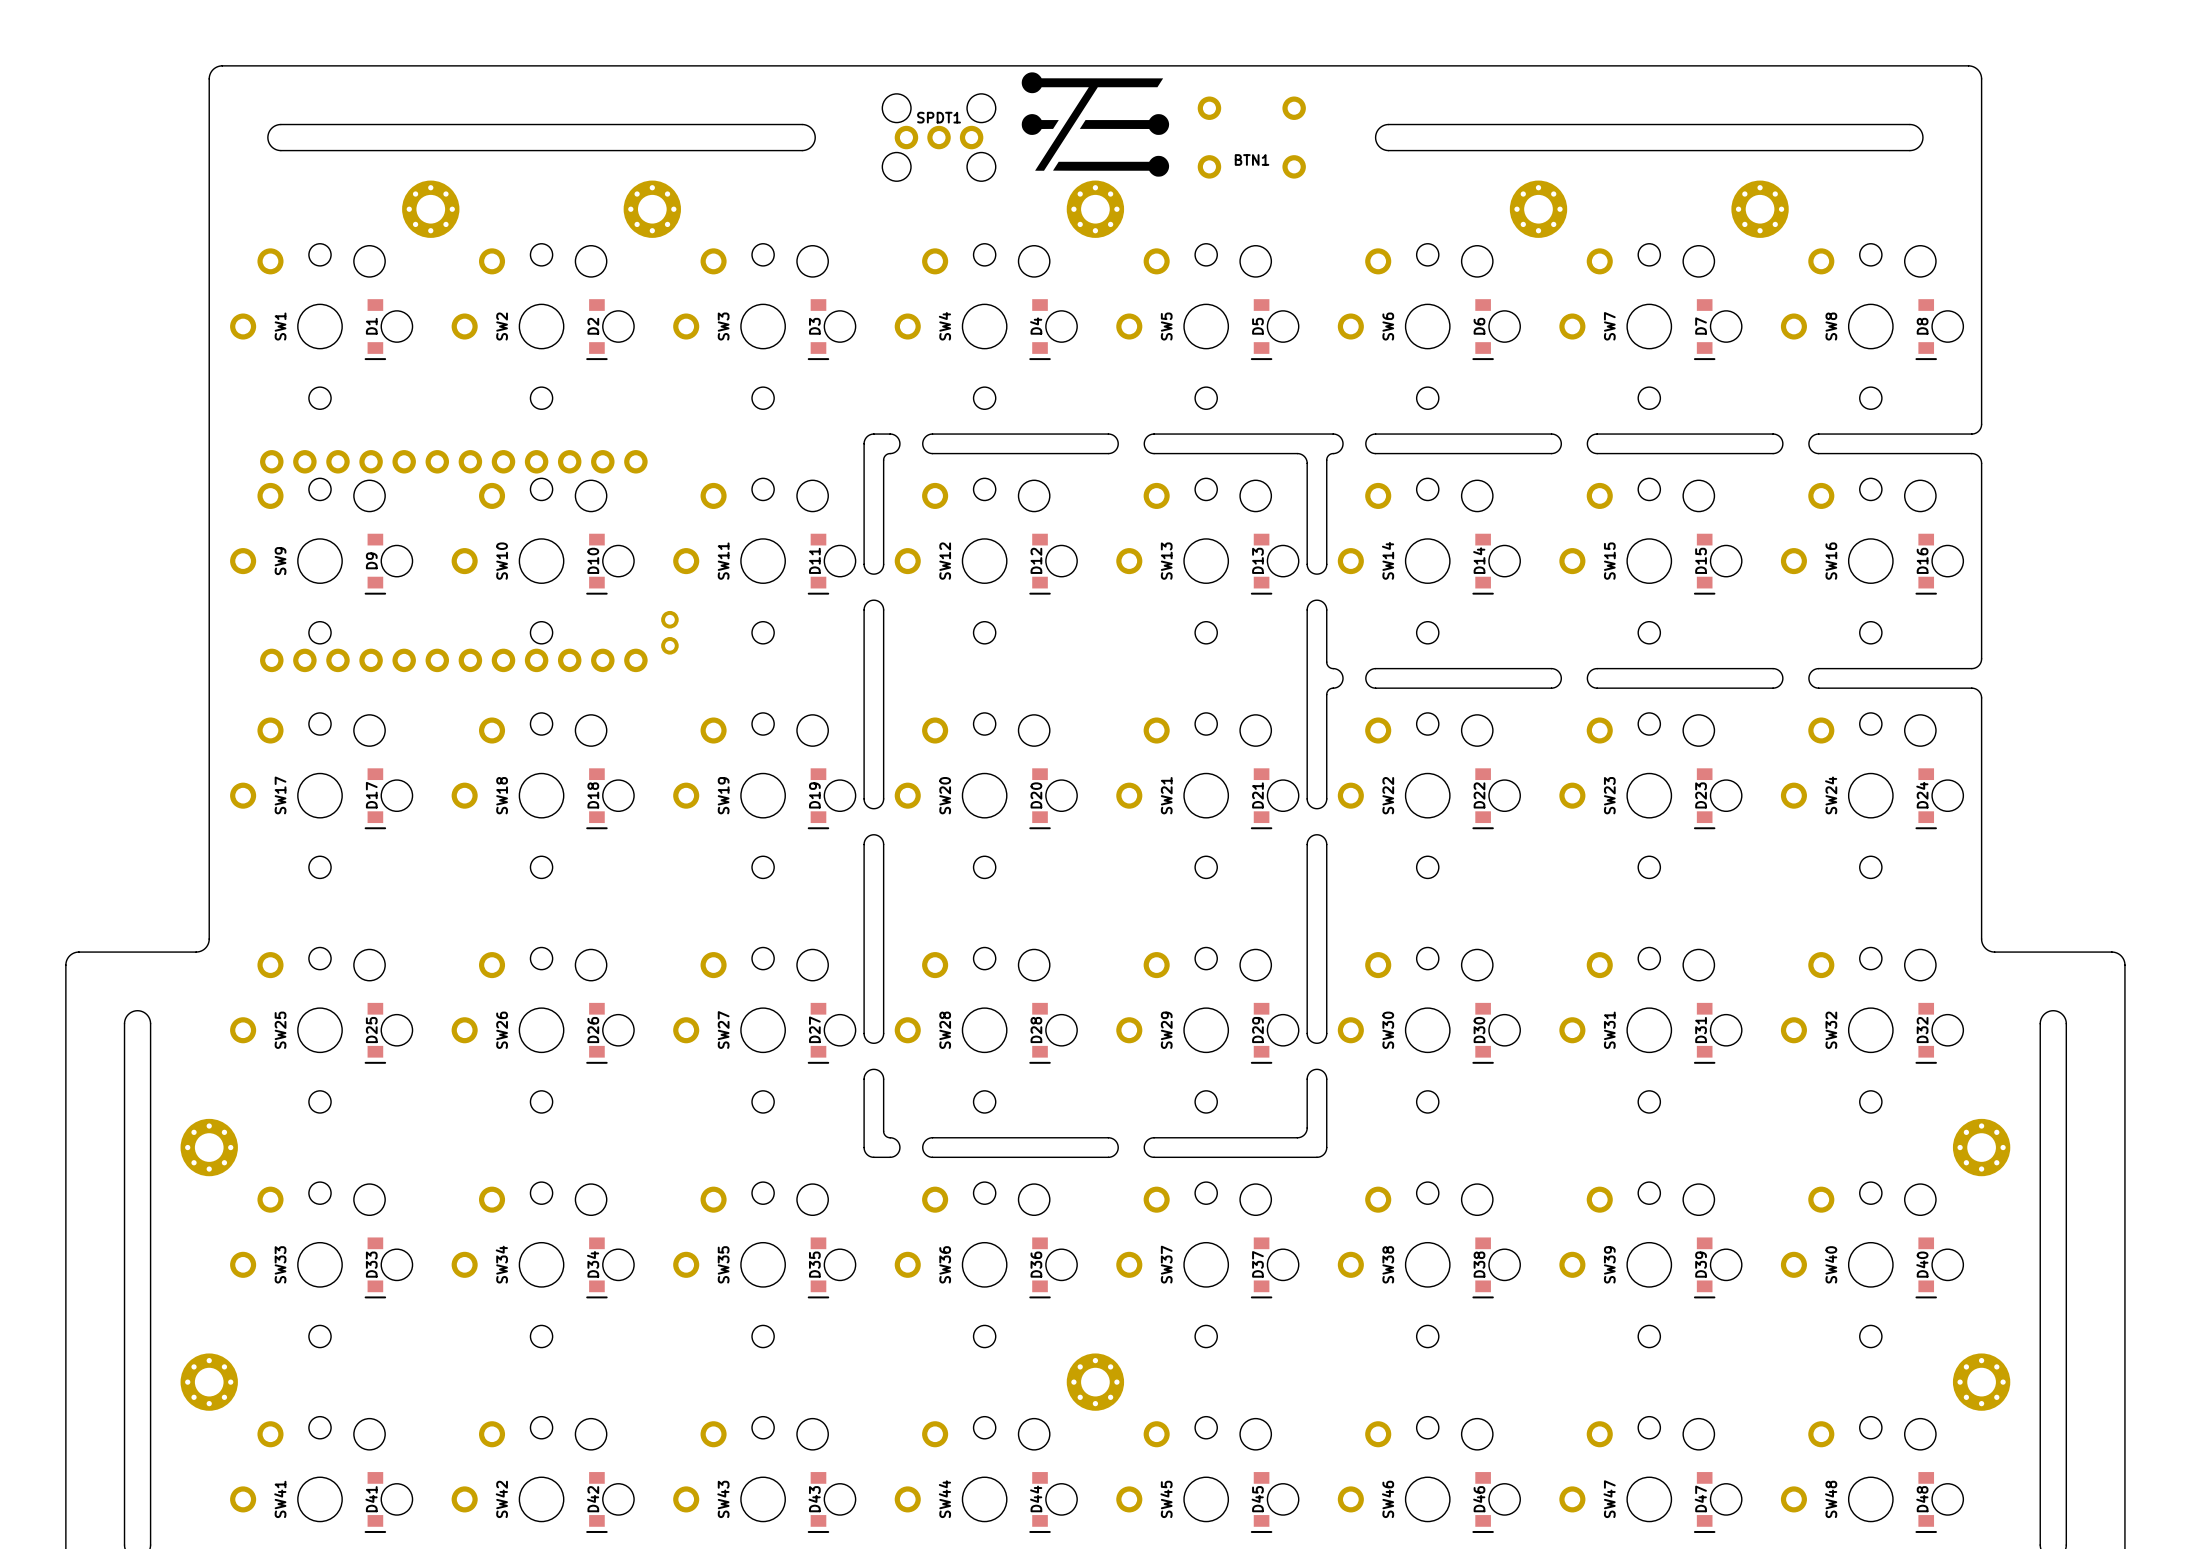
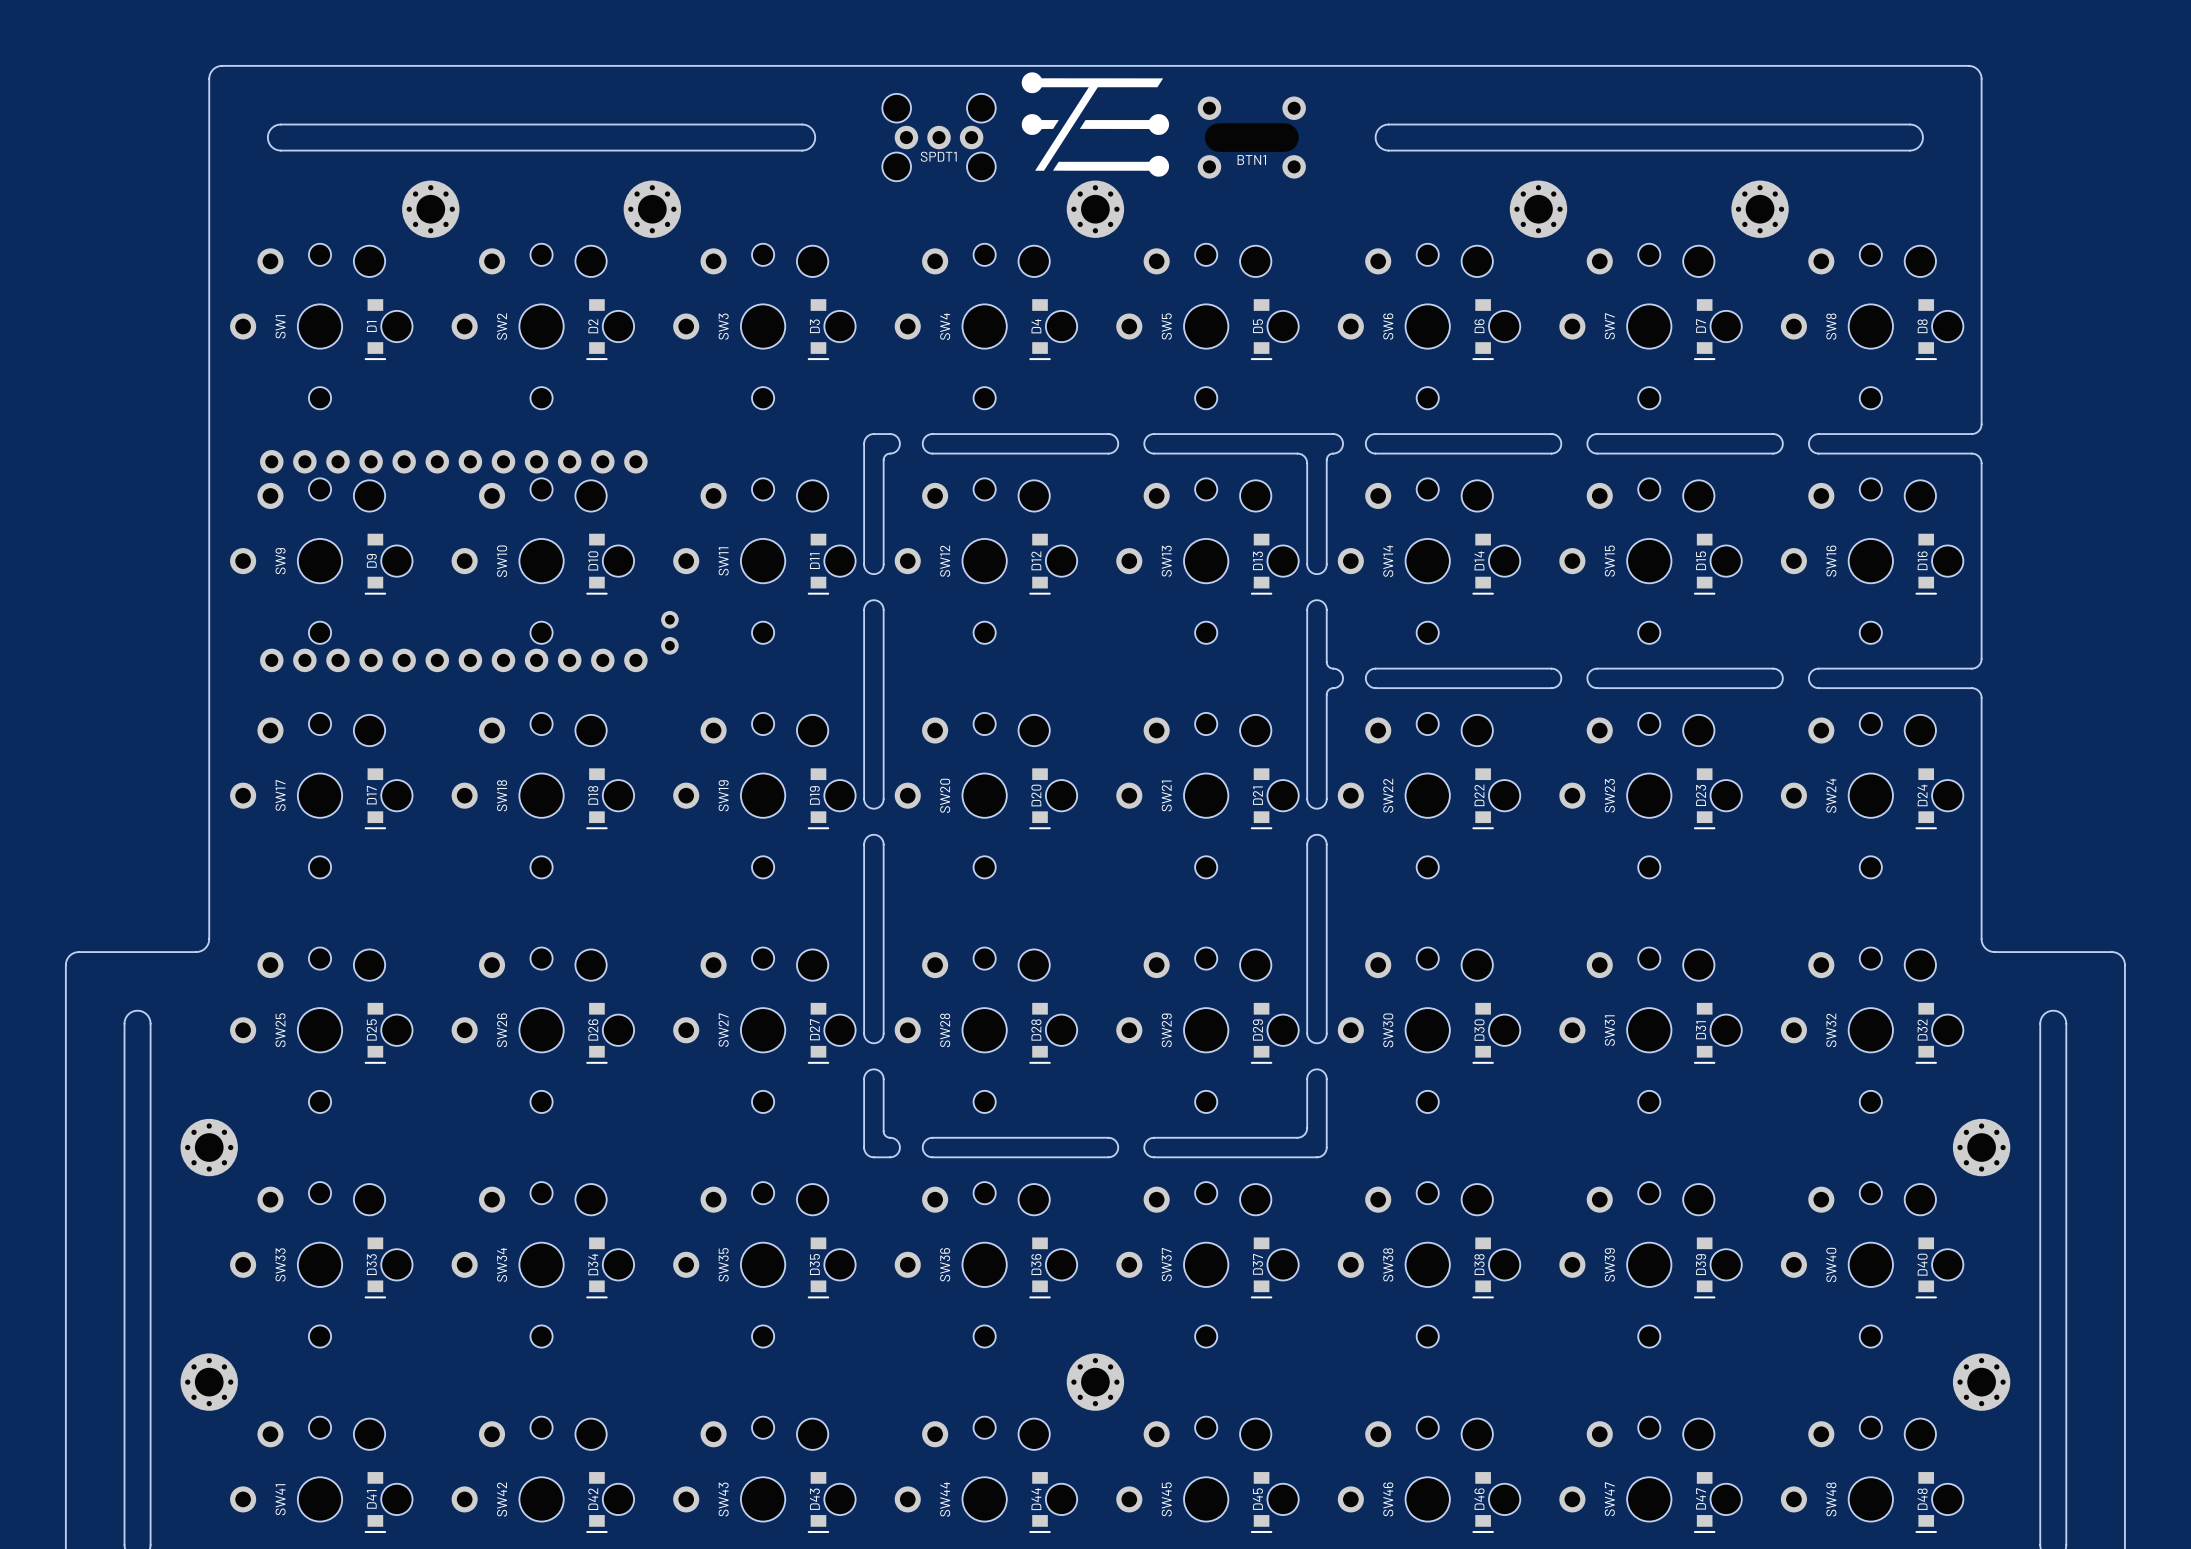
SPDT1 name position: SPDT1 (939, 117) -> SPDT1 (938, 156)

